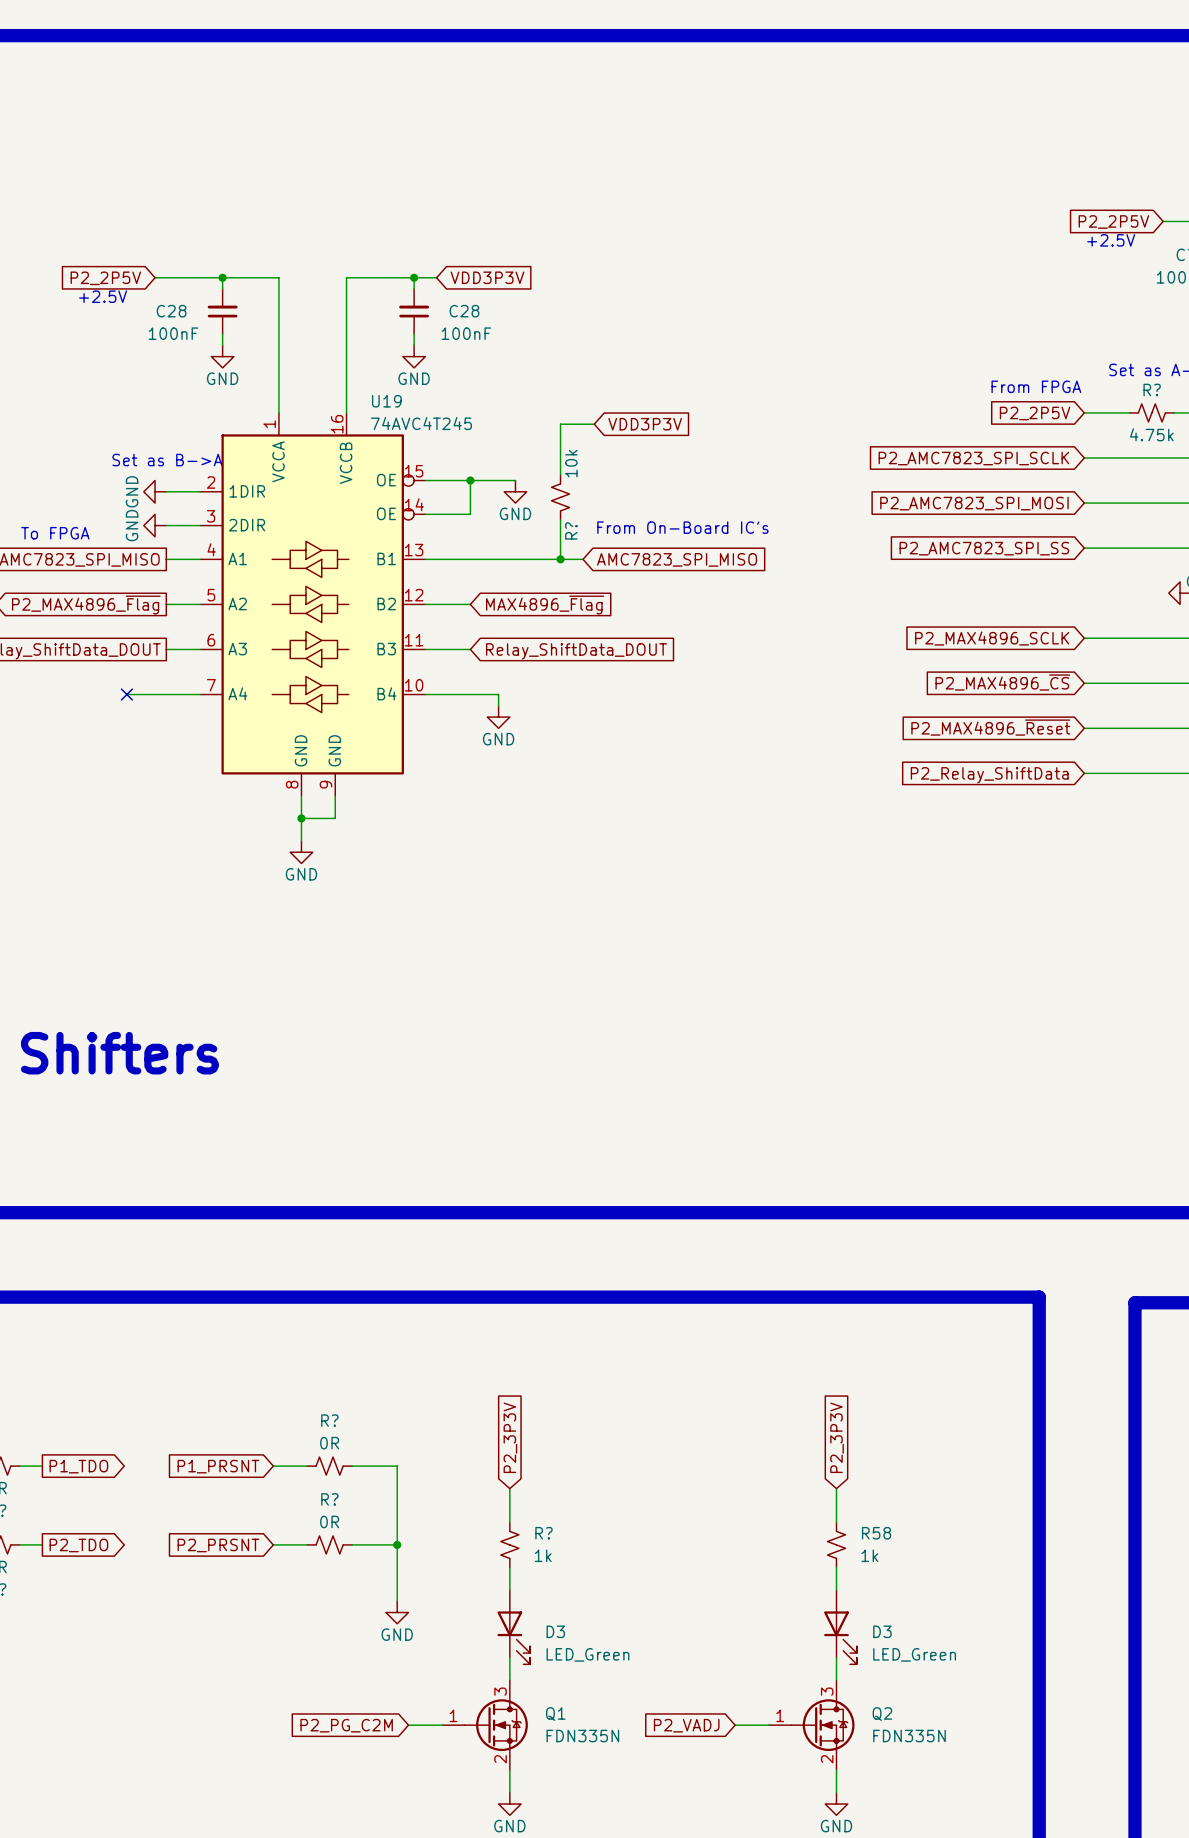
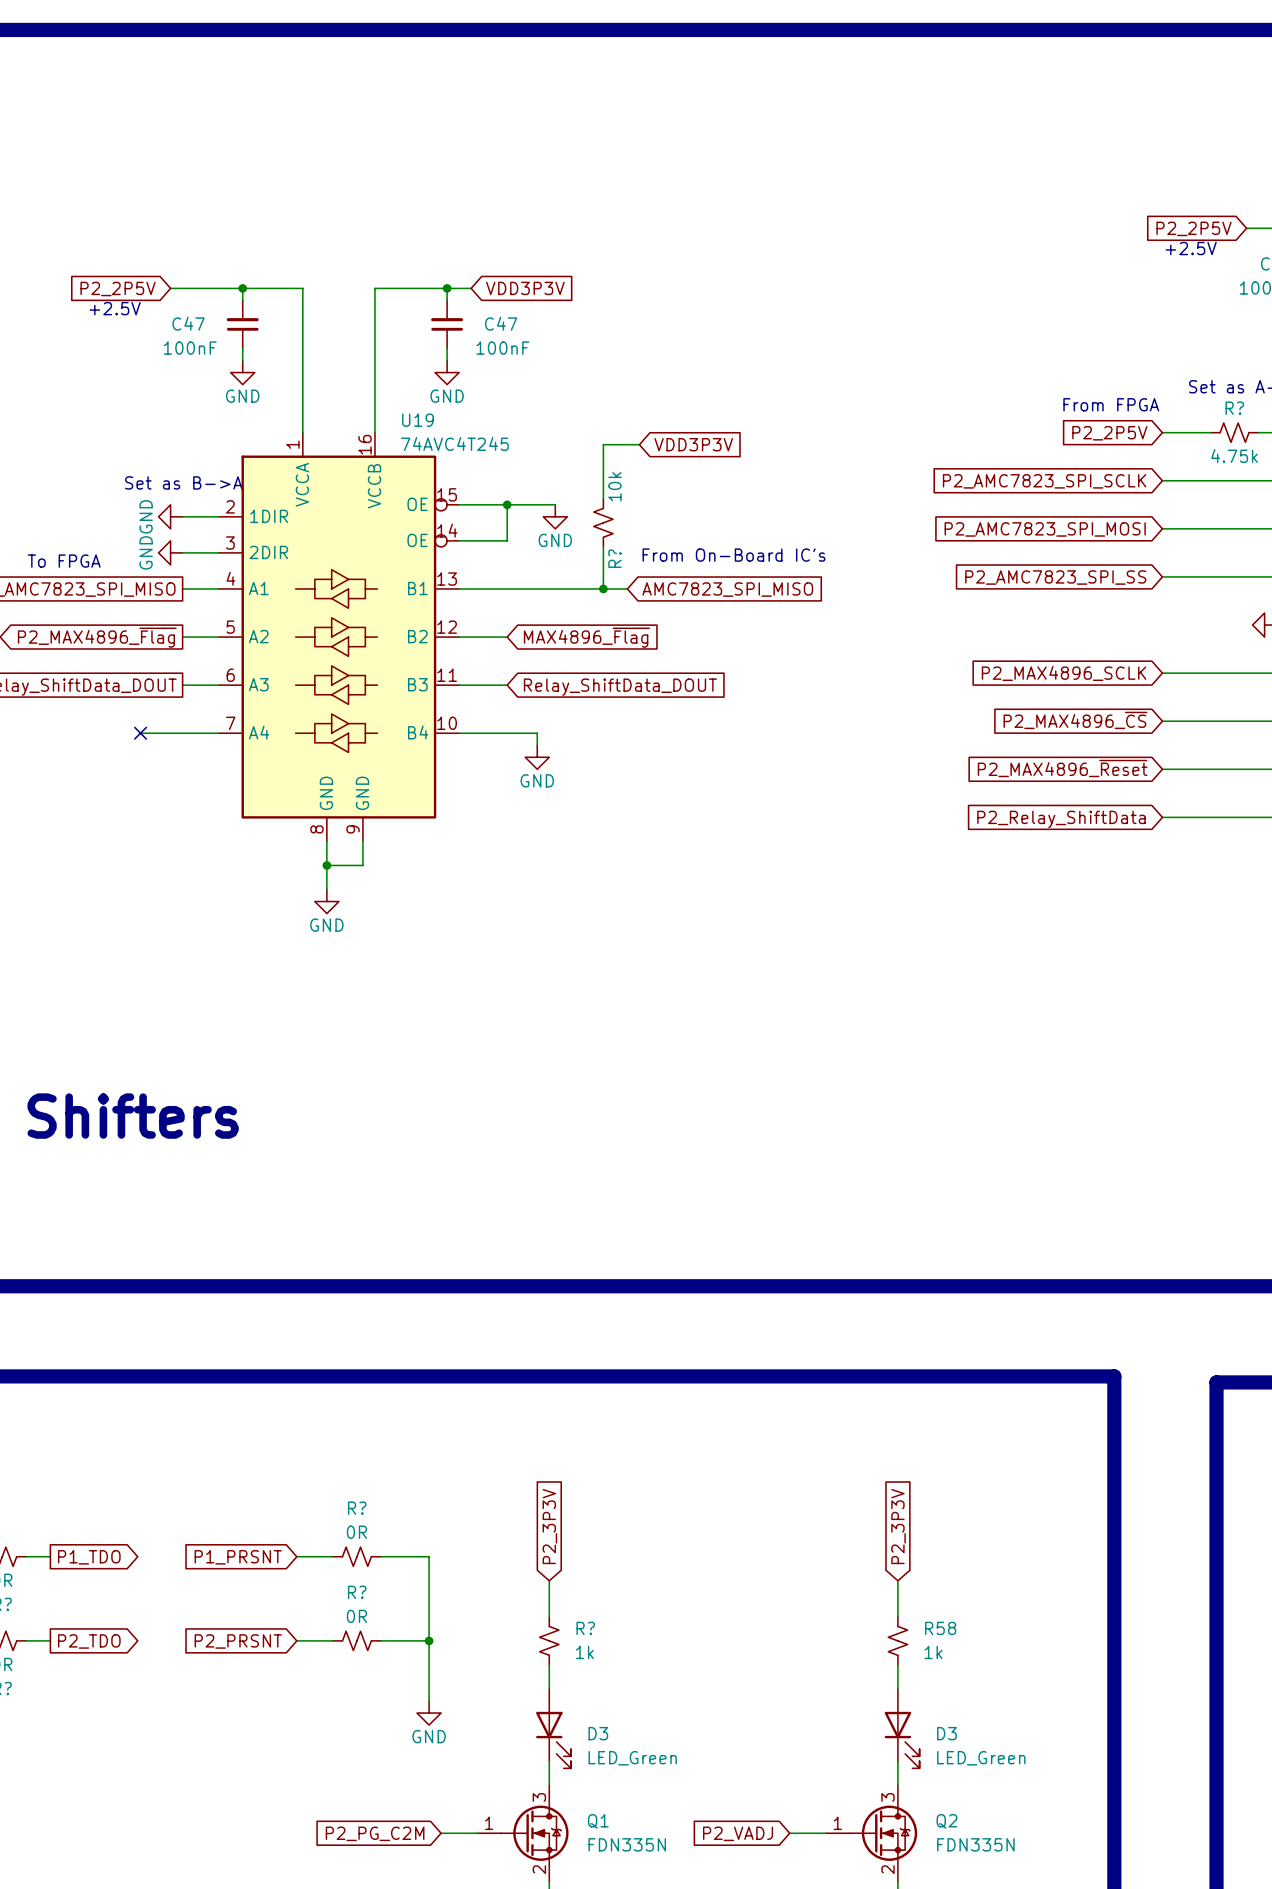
C28 name: C28 (171, 311) -> C47 (188, 323)
C28 name: C28 (464, 311) -> C47 (501, 323)

